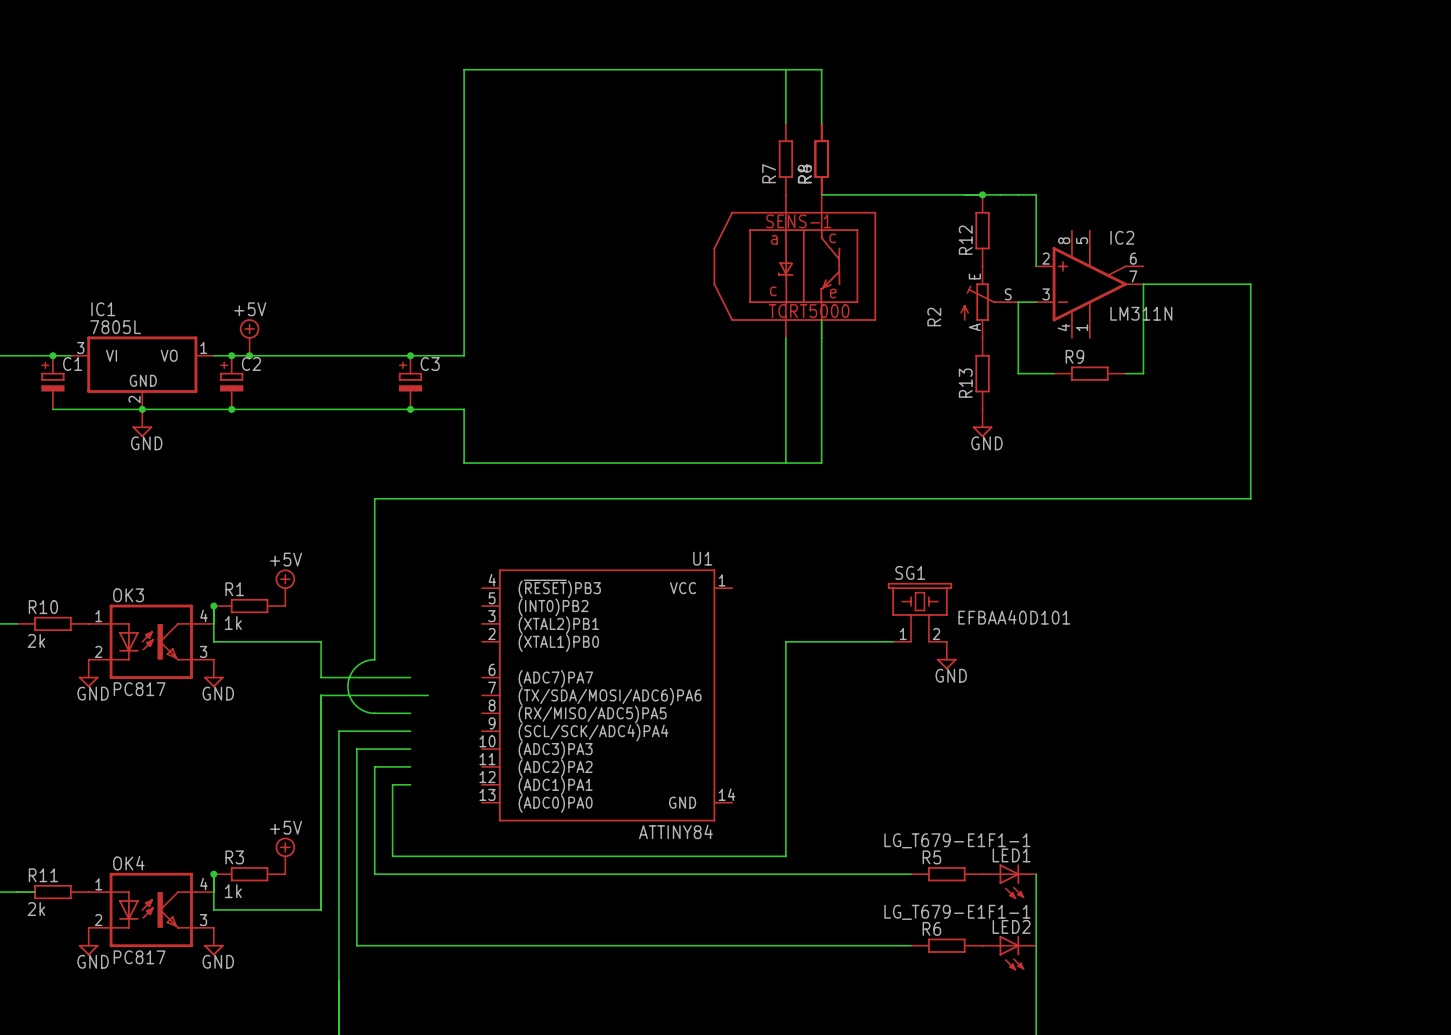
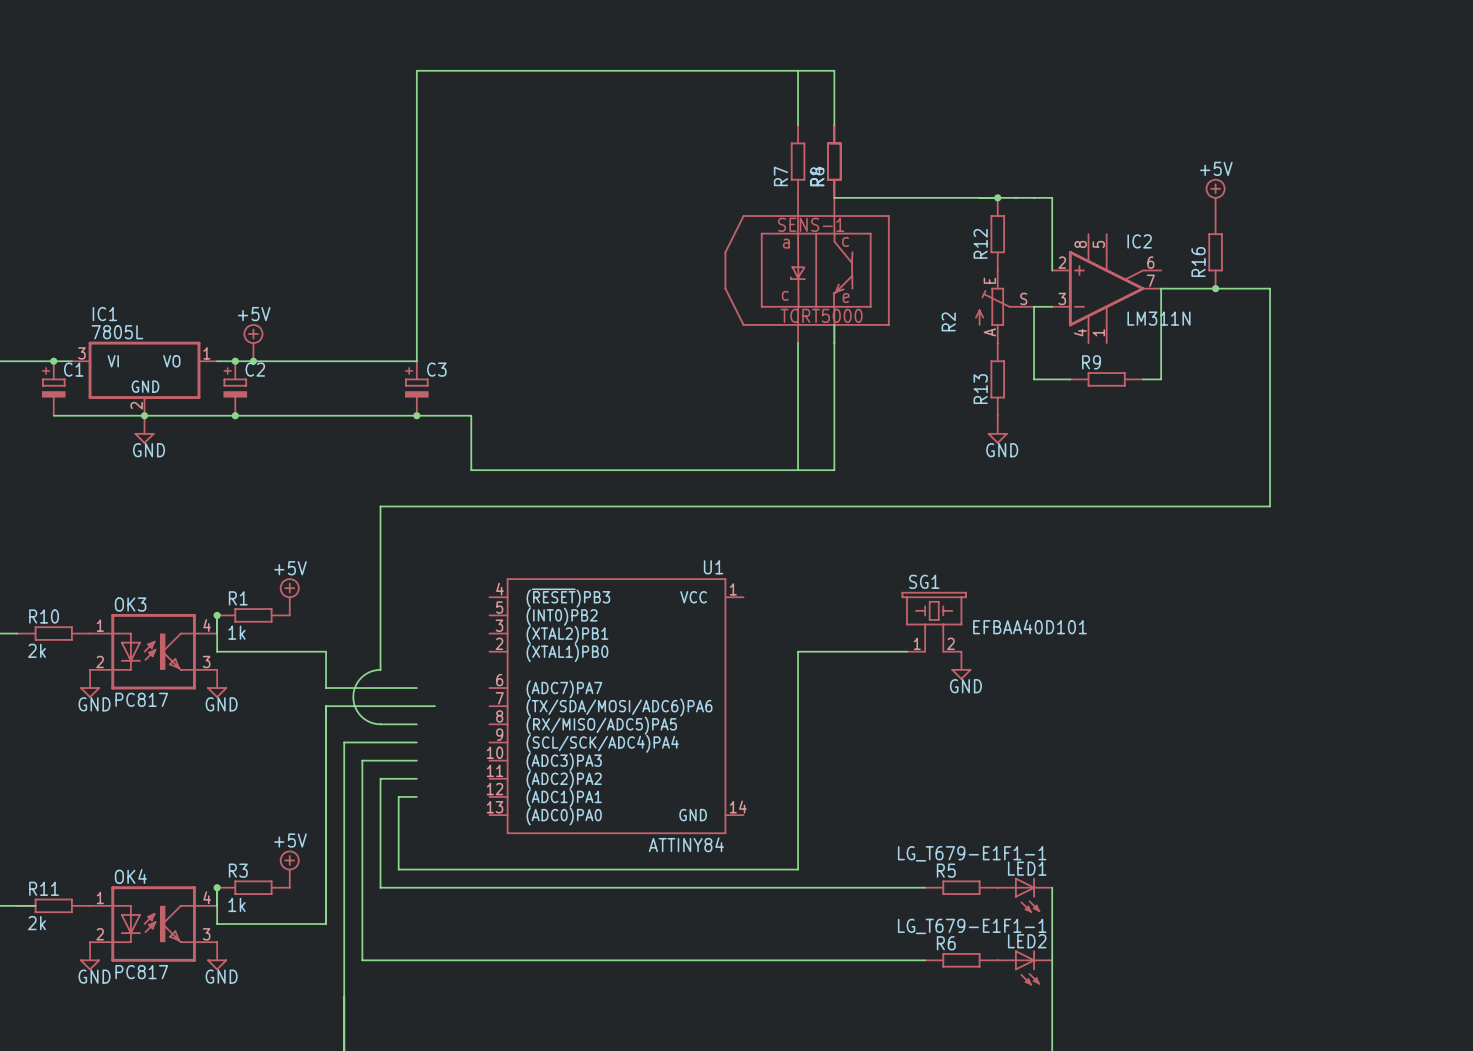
wire: (464, 69) (464, 355) (410, 355) -> (471, 70) (416, 70) (416, 361)
power symbol: none -> +5V (1215, 197)
R16: none -> (1215, 252)
junction: none -> (1215, 288)
junction: (410, 355) -> none

